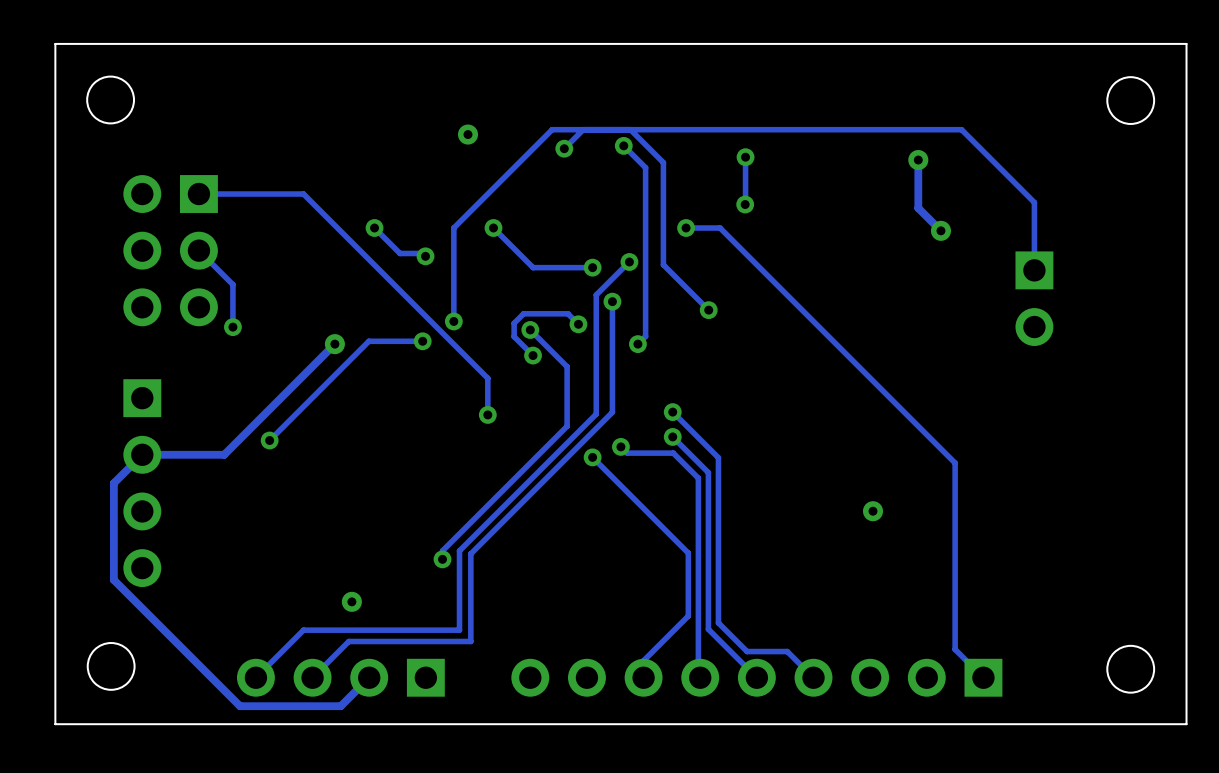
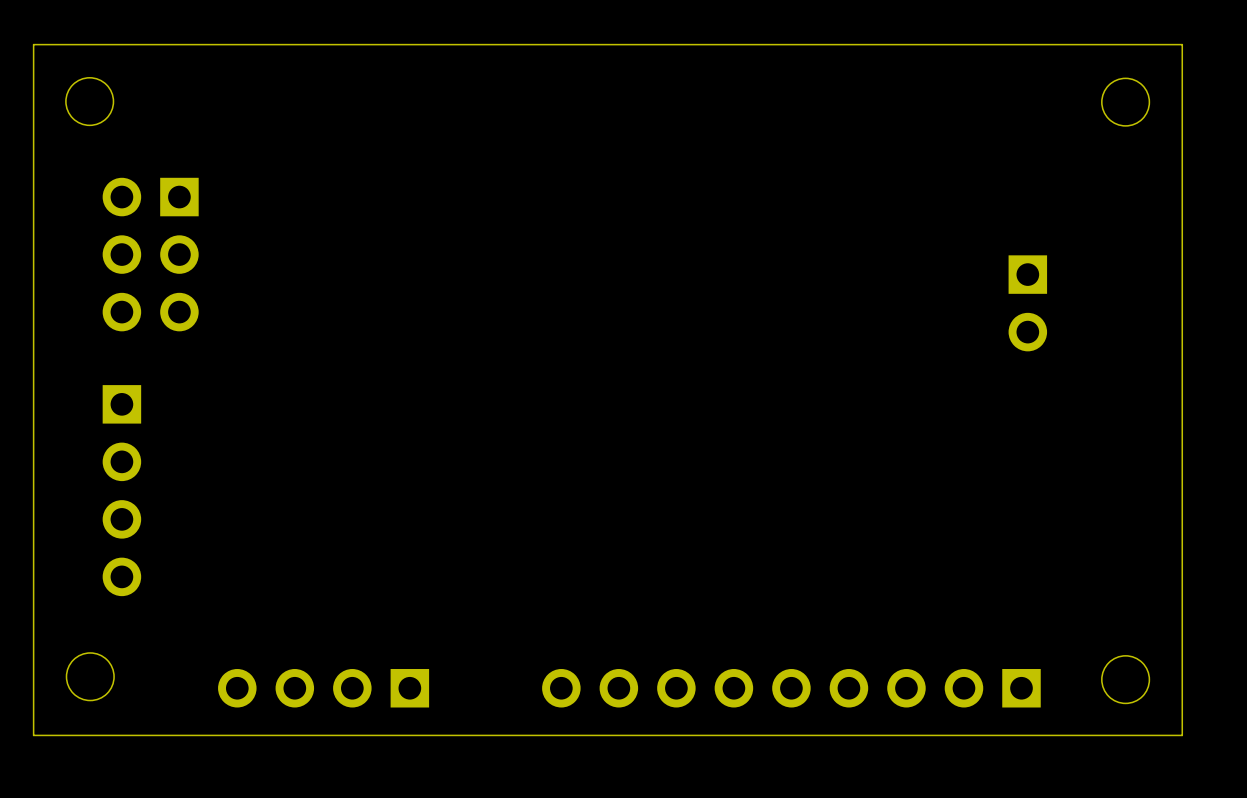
track: (583, 129) (564, 148) -> none
track: (630, 129) (663, 162) (663, 264) (708, 310) -> none
via: (468, 134) -> none
track: (623, 145) (645, 167) (645, 336) (637, 344) -> none
via: (623, 145) -> none
via: (564, 148) -> none
track: (745, 157) (745, 204) -> none
via: (745, 157) -> none
track: (918, 160) (918, 208) (940, 230) -> none
via: (918, 160) -> none
track: (198, 194) (303, 194) (487, 378) (487, 414) -> none
via: (745, 204) -> none
track: (374, 228) (400, 253) (422, 253) (425, 256) -> none
via: (374, 228) -> none
track: (493, 228) (533, 267) (592, 267) -> none
via: (493, 228) -> none
track: (686, 228) (720, 228) (955, 463) (955, 649) (983, 677) -> none
via: (686, 228) -> none
via: (940, 230) -> none
track: (198, 250) (232, 284) (232, 327) -> none
via: (425, 256) -> none
track: (629, 261) (596, 294) (596, 414) (459, 550) (459, 630) (303, 630) (255, 677) -> none
via: (629, 261) -> none
via: (592, 267) -> none
track: (1034, 270) (1034, 202) (961, 129) (552, 129) (453, 228) (453, 321) -> none
track: (612, 301) (612, 412) (470, 553) (470, 641) (348, 641) (312, 677) -> none
via: (612, 301) -> none
via: (708, 310) -> none
via: (453, 321) -> none
track: (578, 324) (567, 313) (523, 313) (514, 323) (514, 336) (533, 355) -> none
via: (578, 324) -> none
via: (232, 327) -> none
track: (530, 329) (567, 366) (567, 426) (442, 550) (442, 559) -> none
via: (530, 329) -> none
track: (422, 341) (368, 341) (269, 440) -> none
via: (422, 341) -> none
track: (334, 344) (224, 454) (142, 454) (113, 483) (113, 579) (240, 706) (340, 706) (369, 677) -> none
via: (334, 344) -> none
via: (637, 344) -> none
via: (533, 355) -> none
track: (672, 412) (718, 457) (718, 622) (747, 651) (787, 651) (813, 677) -> none
via: (672, 412) -> none
via: (487, 414) -> none
track: (672, 436) (708, 472) (708, 629) (756, 677) -> none
via: (672, 436) -> none
via: (269, 440) -> none
track: (620, 446) (627, 453) (673, 453) (698, 478) (698, 675) (700, 677) -> none
via: (620, 446) -> none
track: (592, 457) (688, 553) (688, 616) (643, 660) (643, 677) -> none
via: (592, 457) -> none
via: (872, 511) -> none
via: (442, 559) -> none
via: (351, 601) -> none
part position: (756, 677) -> (791, 688)

